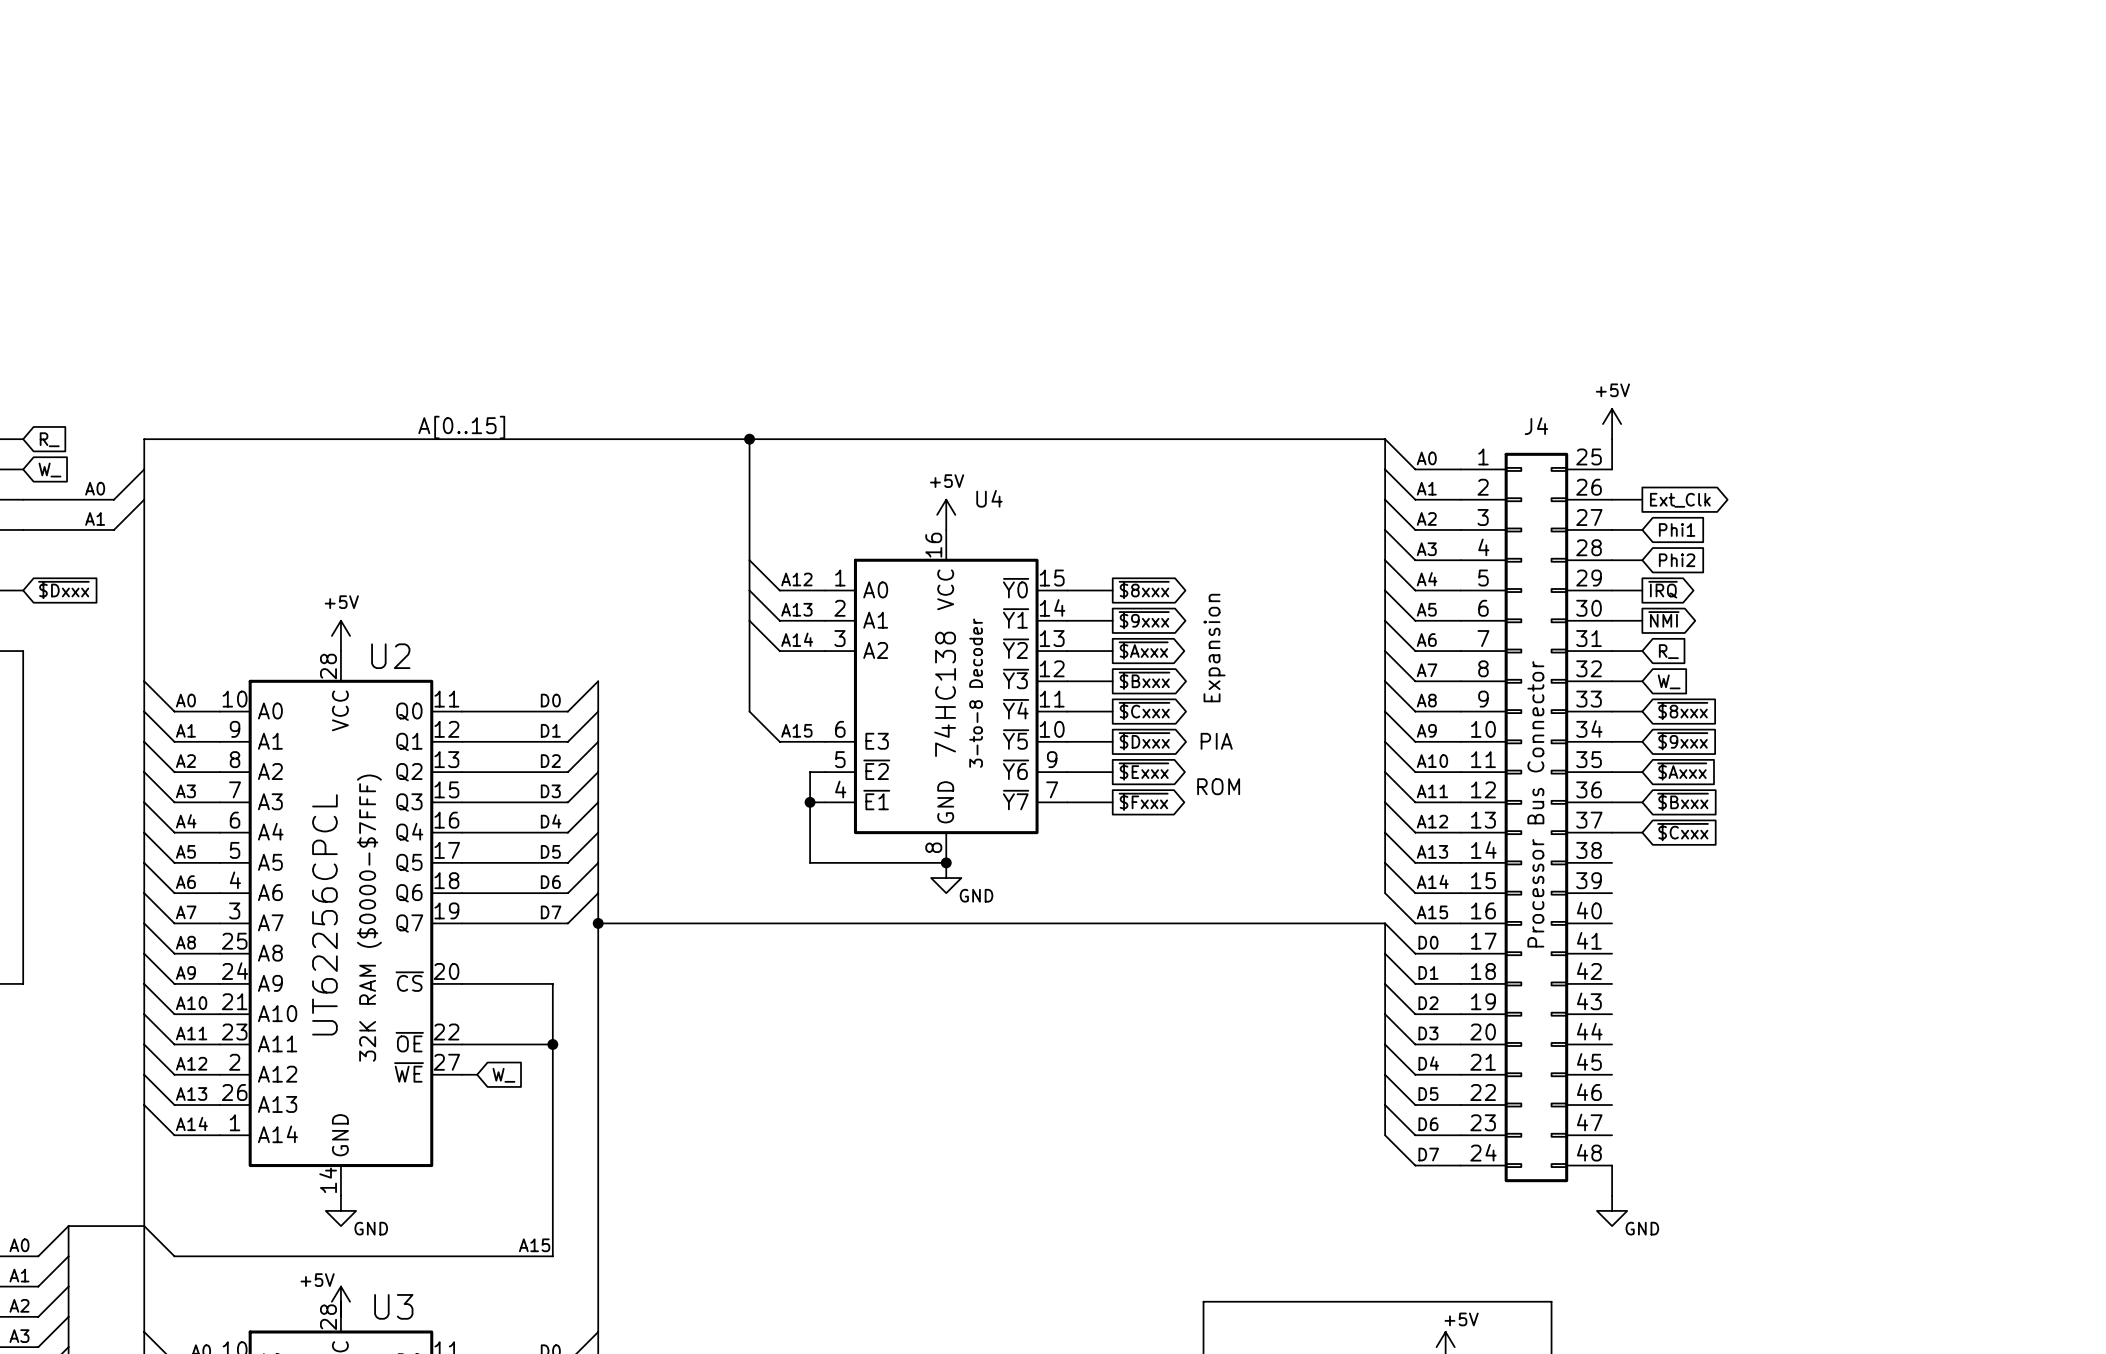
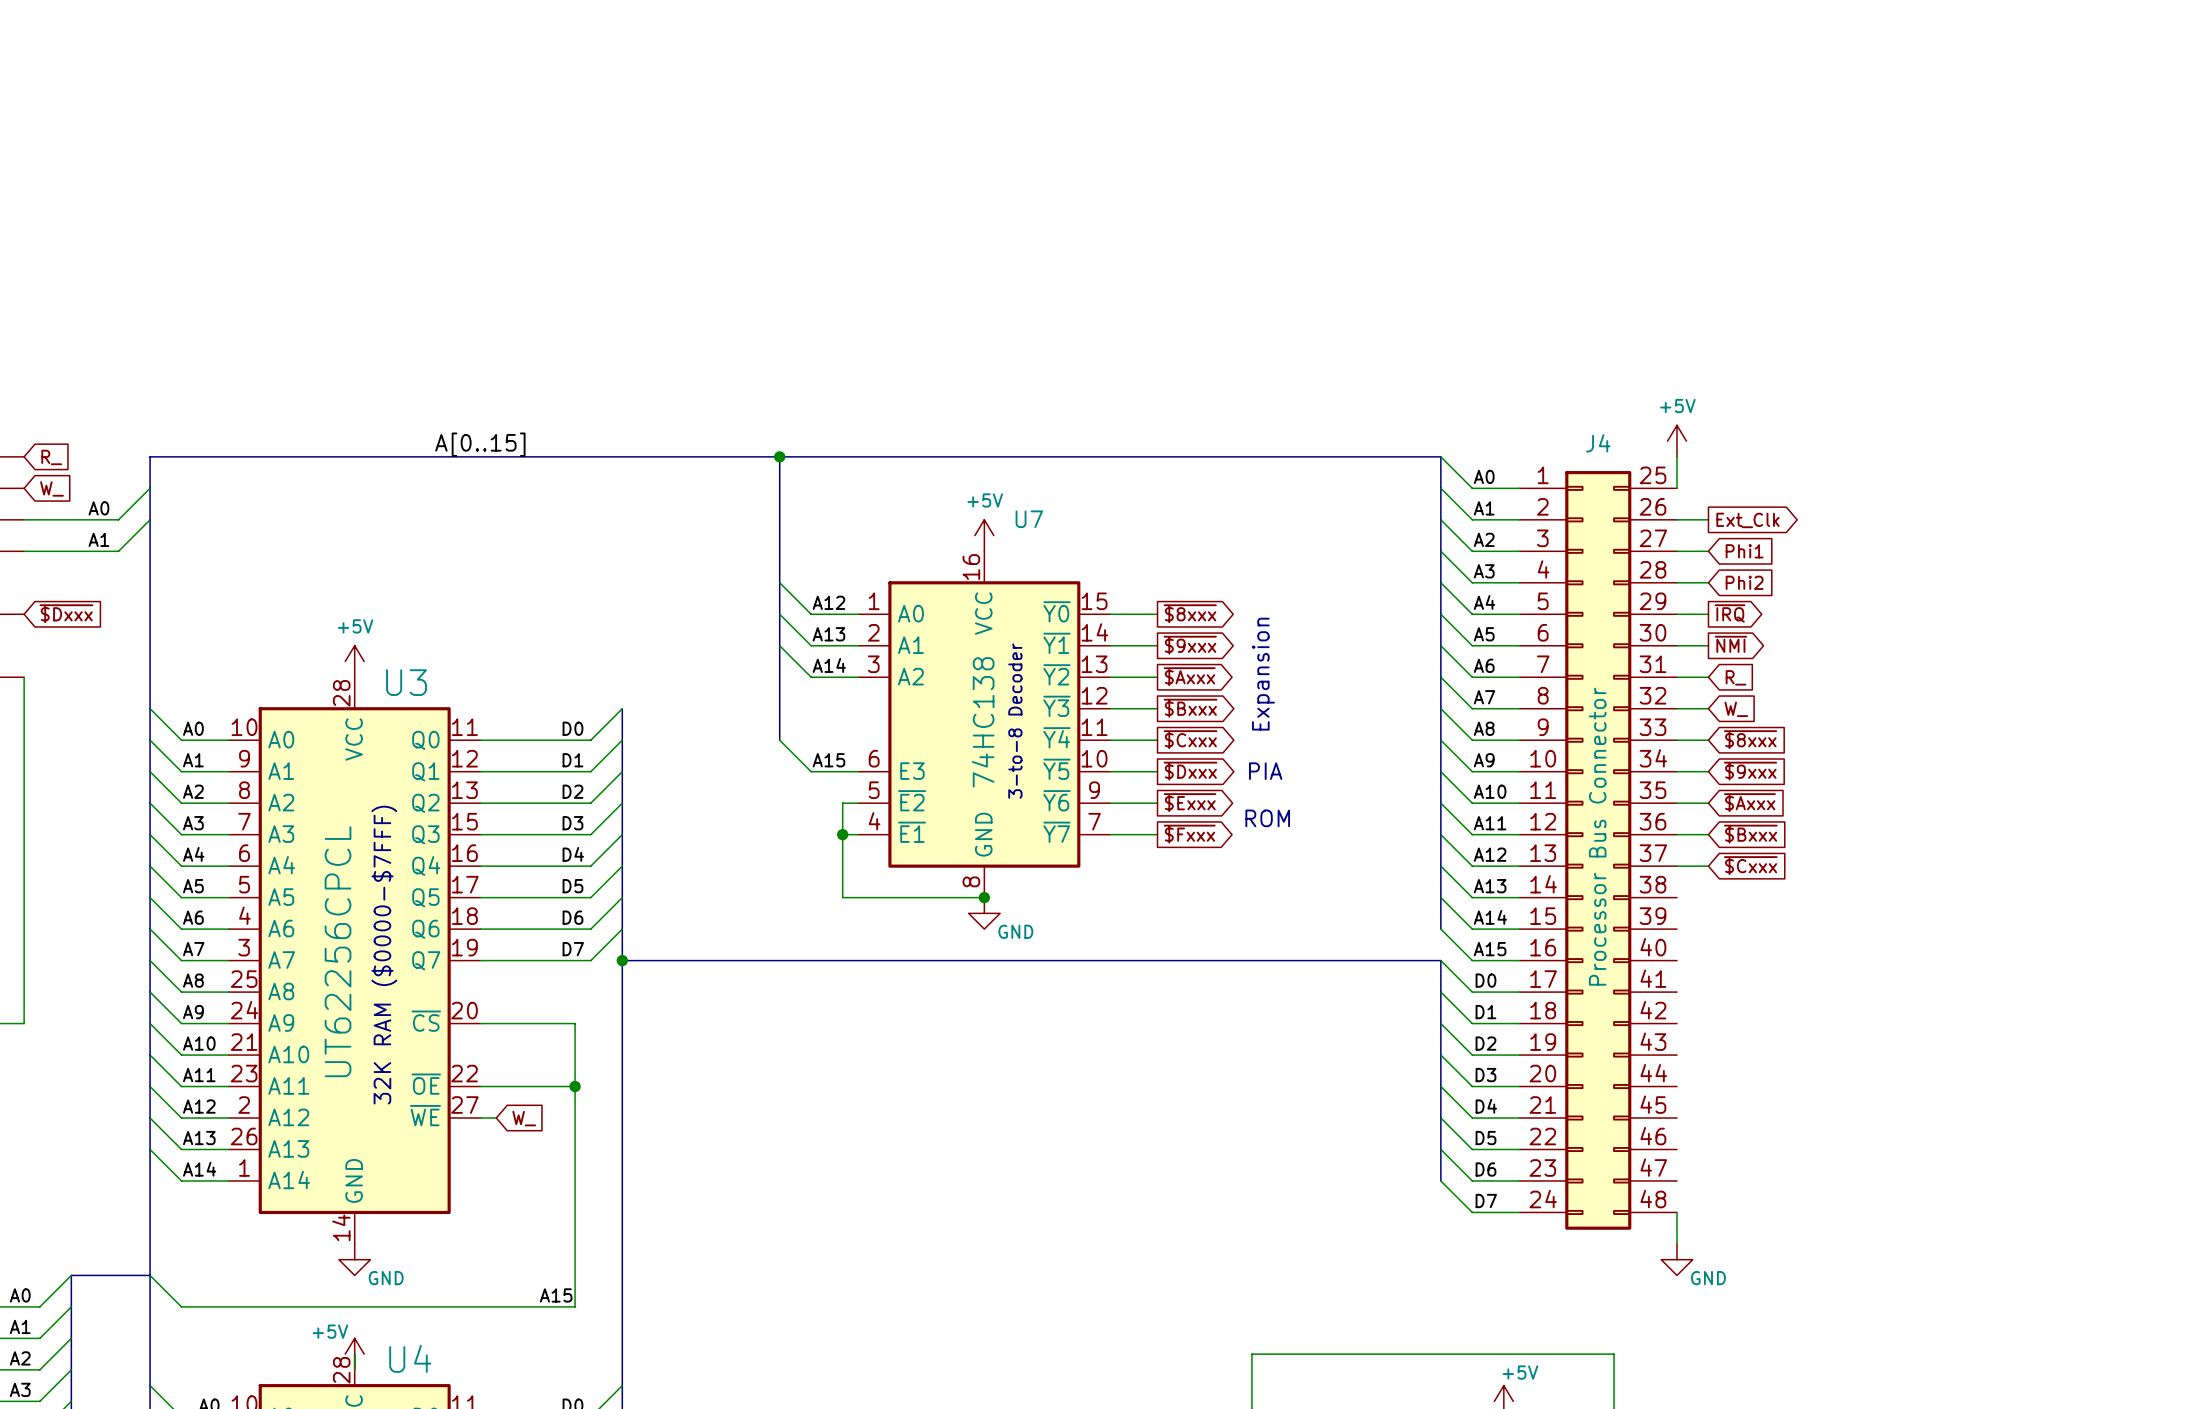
U4 name: U4 (989, 498) -> U7 (1029, 519)
U2 name: U2 (390, 656) -> U3 (406, 682)
U3 name: U3 (393, 1306) -> U4 (410, 1358)

